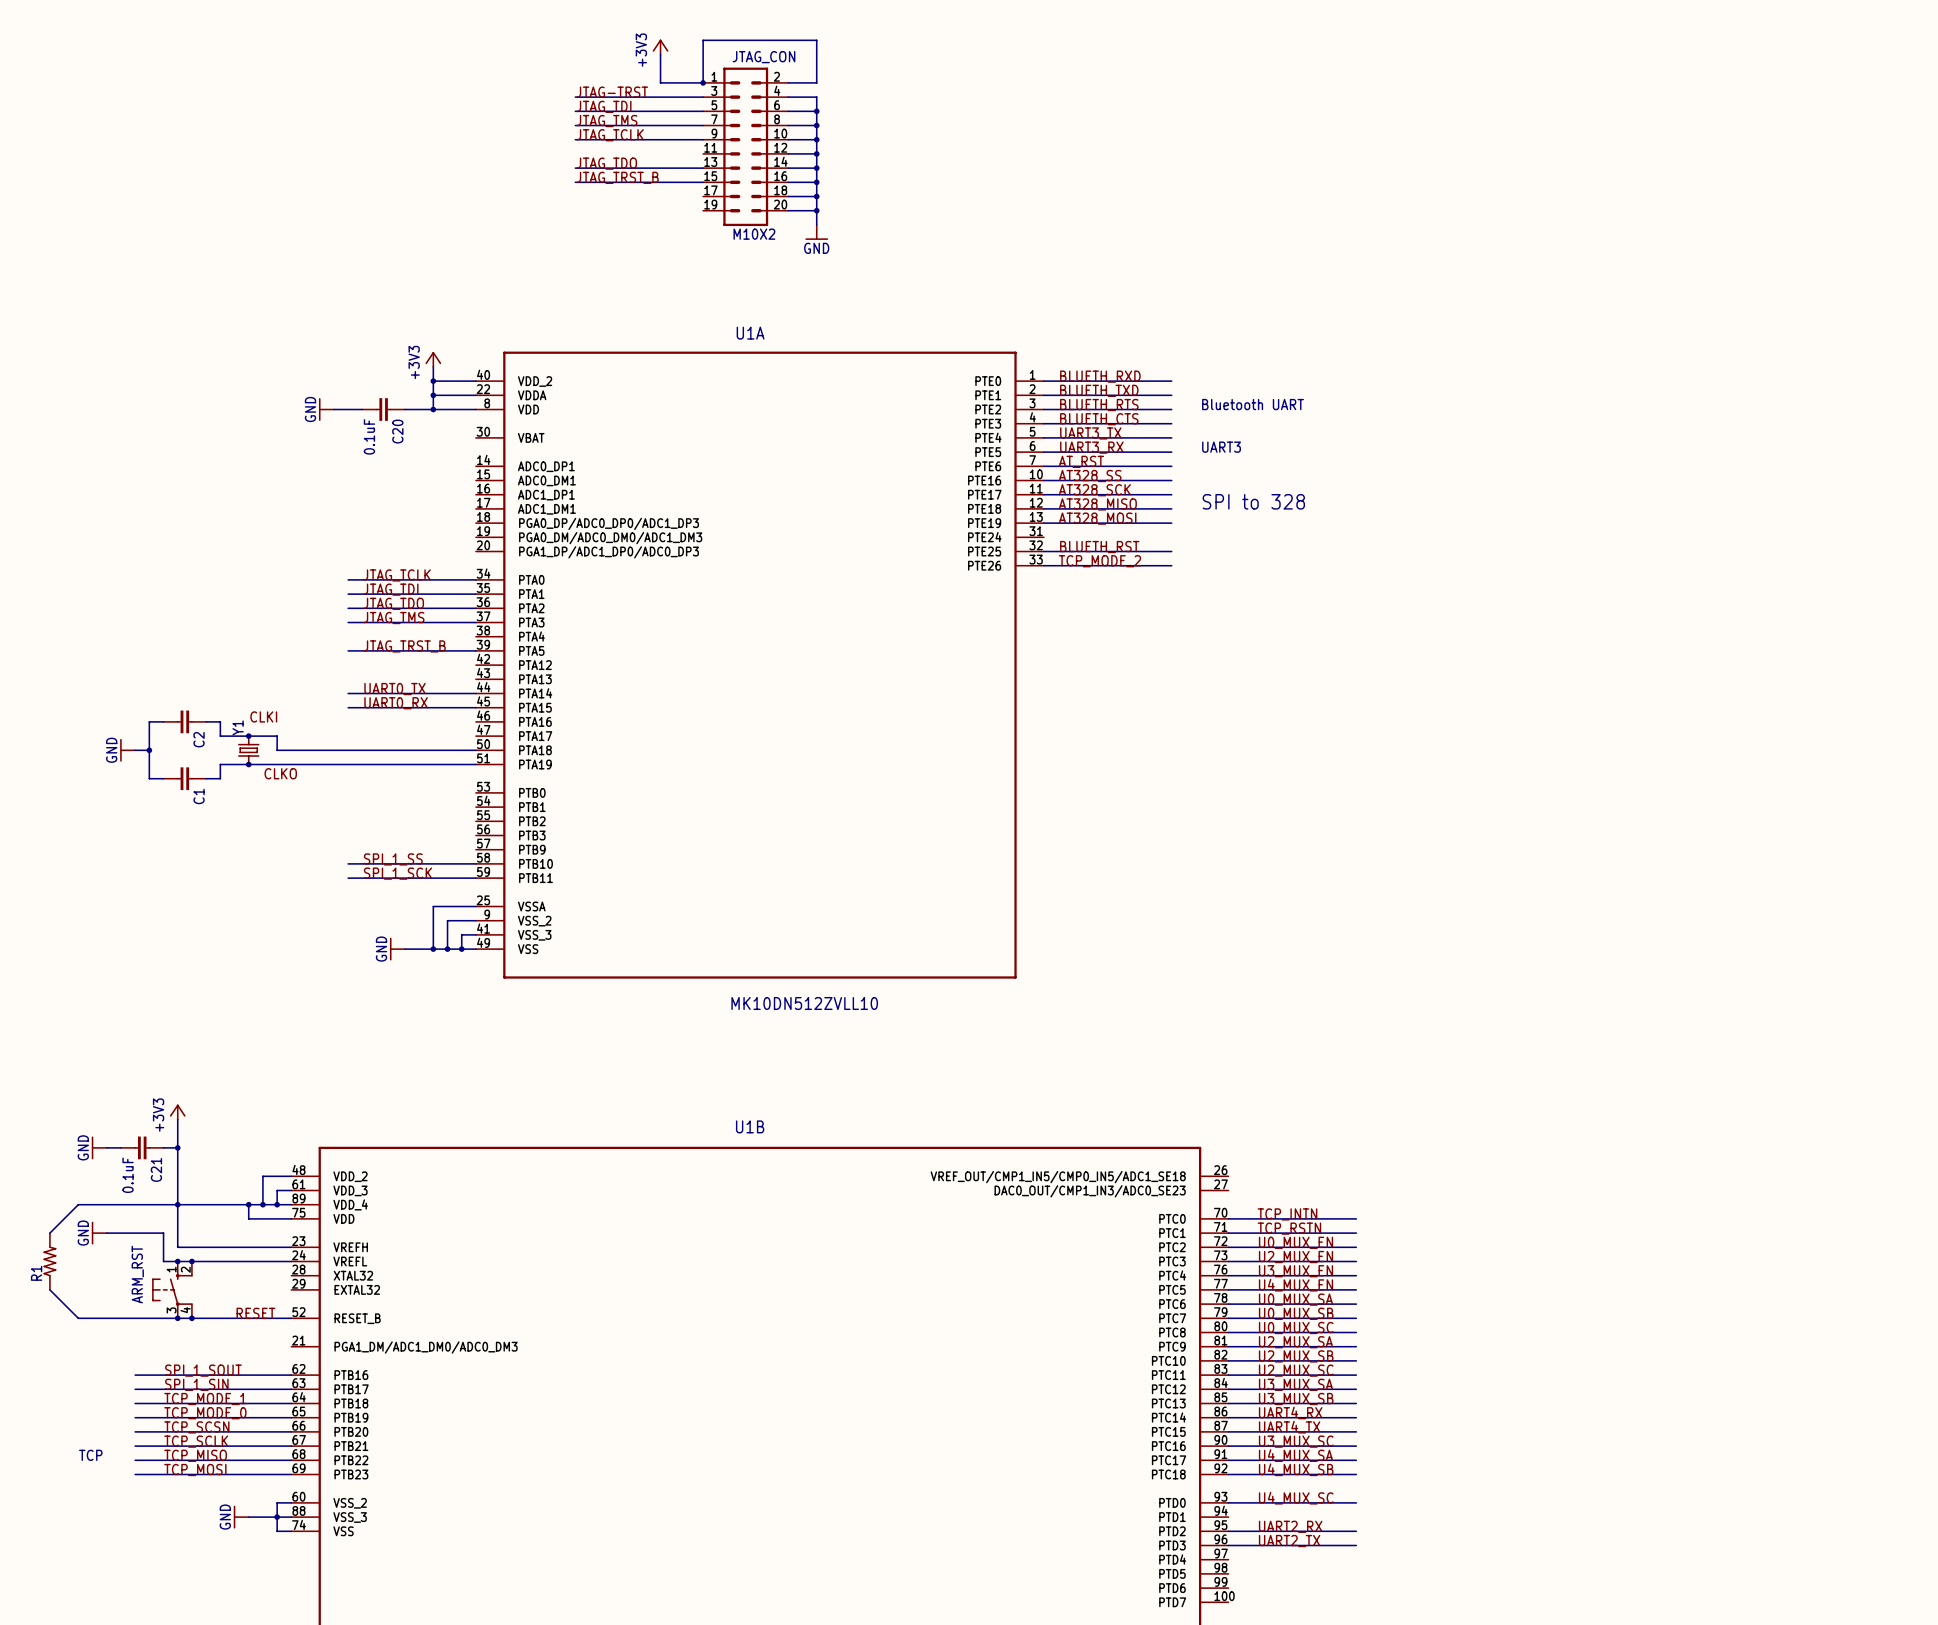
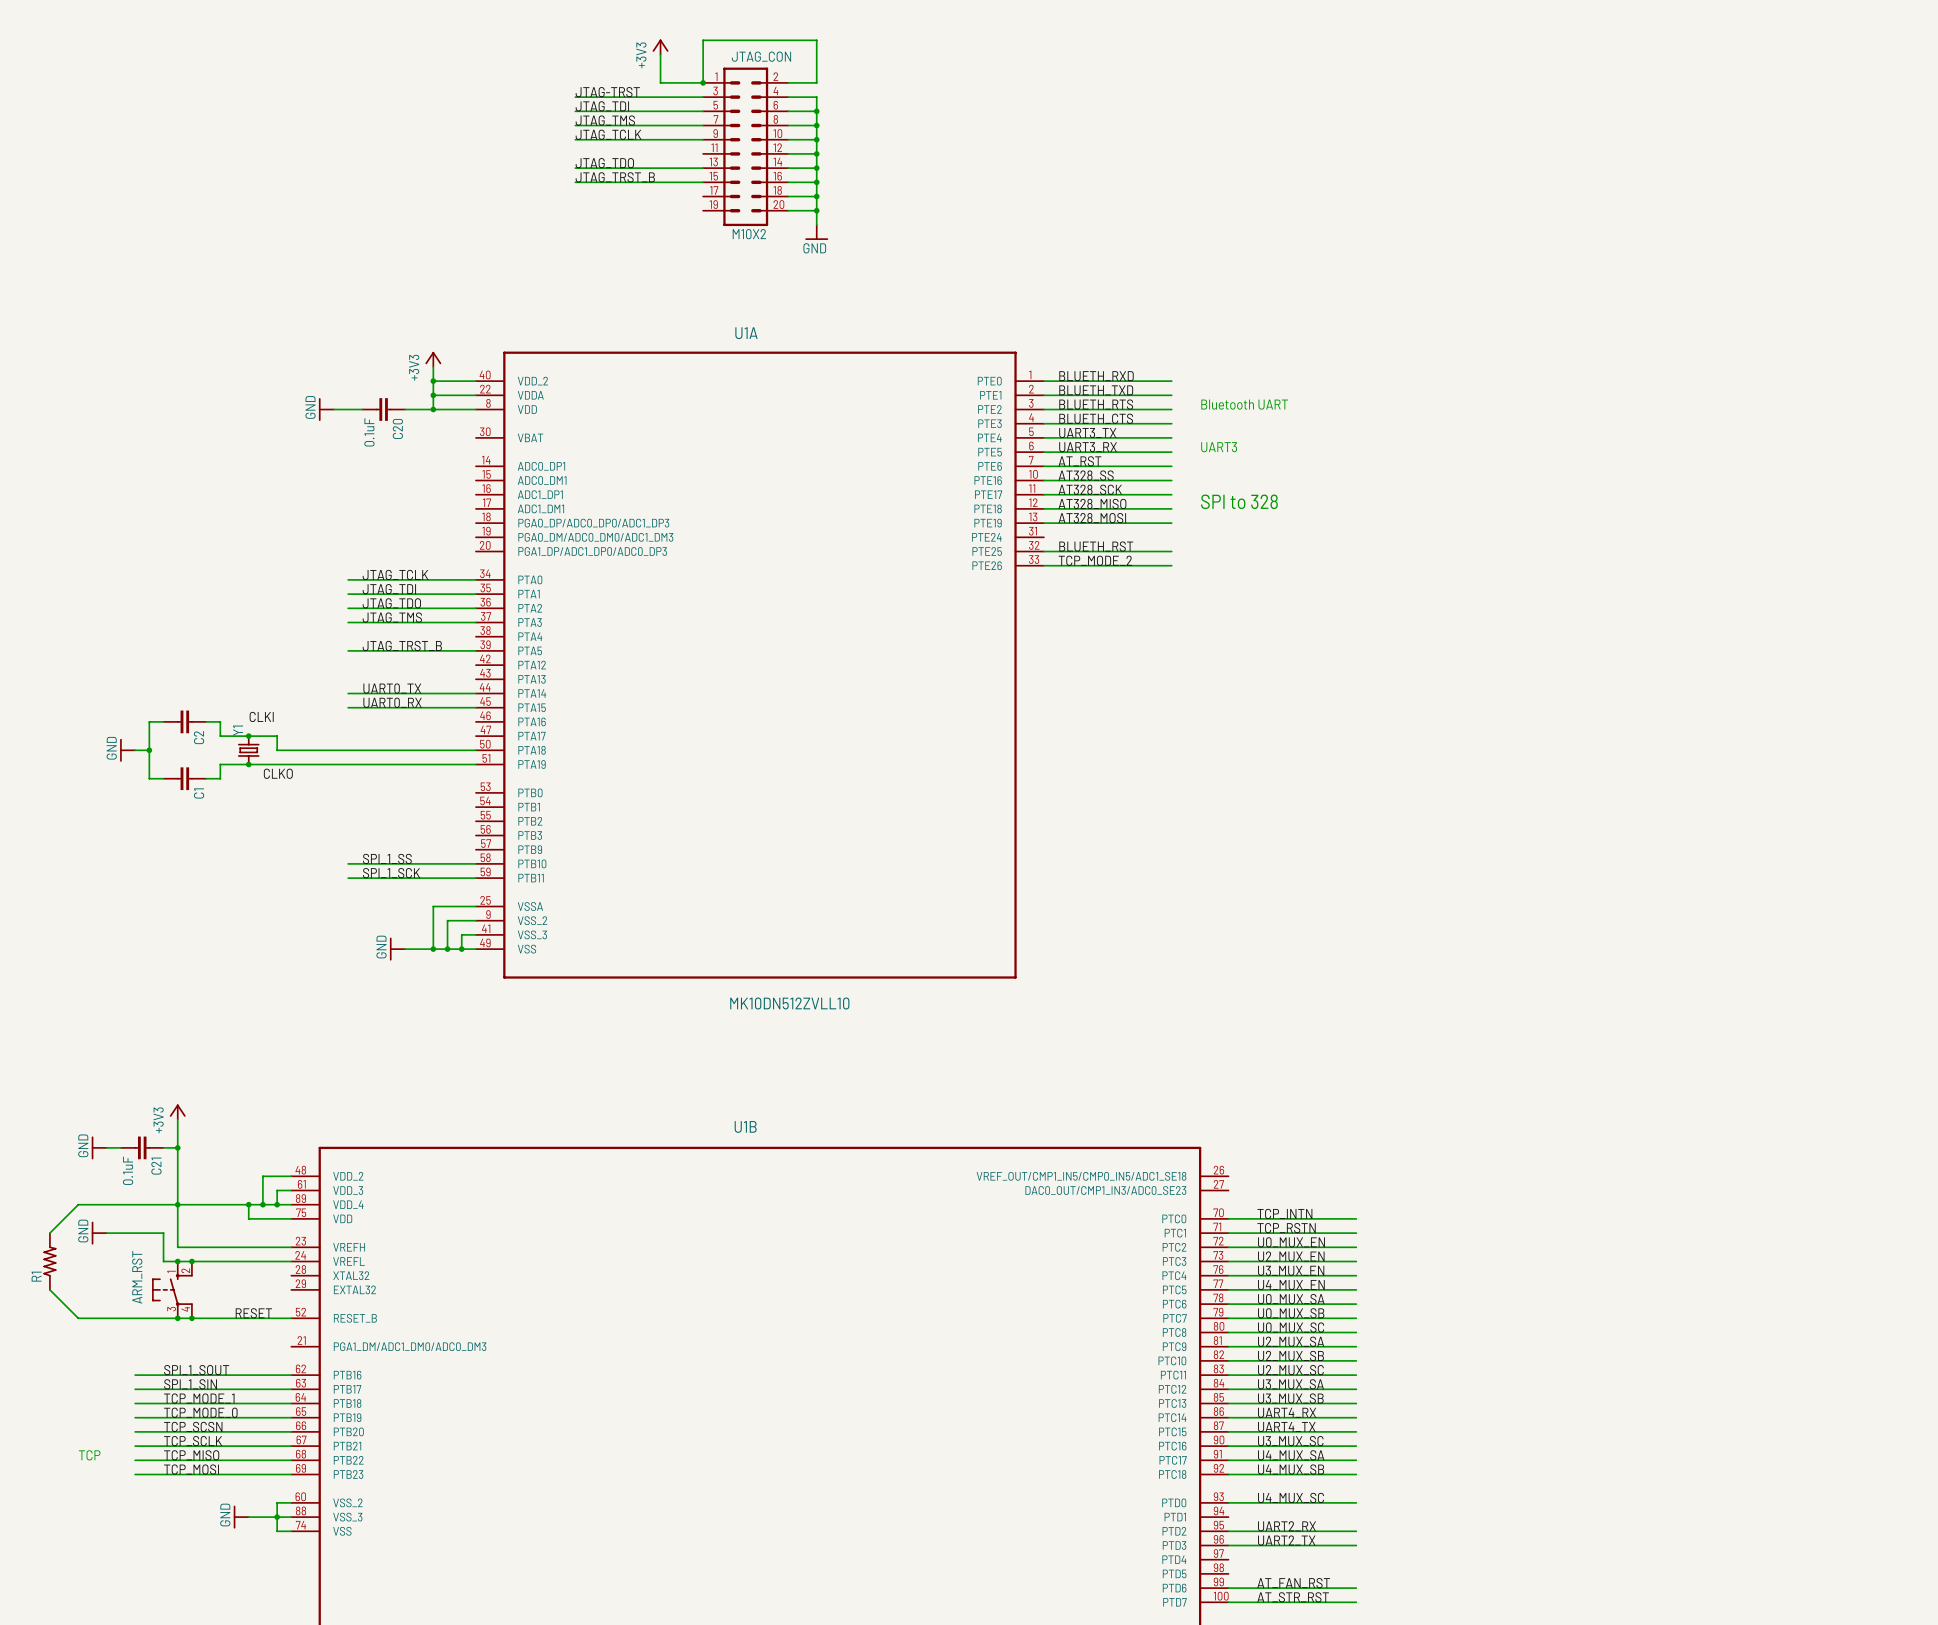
label: none -> AT_FAN_RST (1293, 1583)
wire: none -> (1228, 1588) (1356, 1588)
label: none -> AT_STR_RST (1293, 1597)
wire: none -> (1228, 1602) (1356, 1602)

